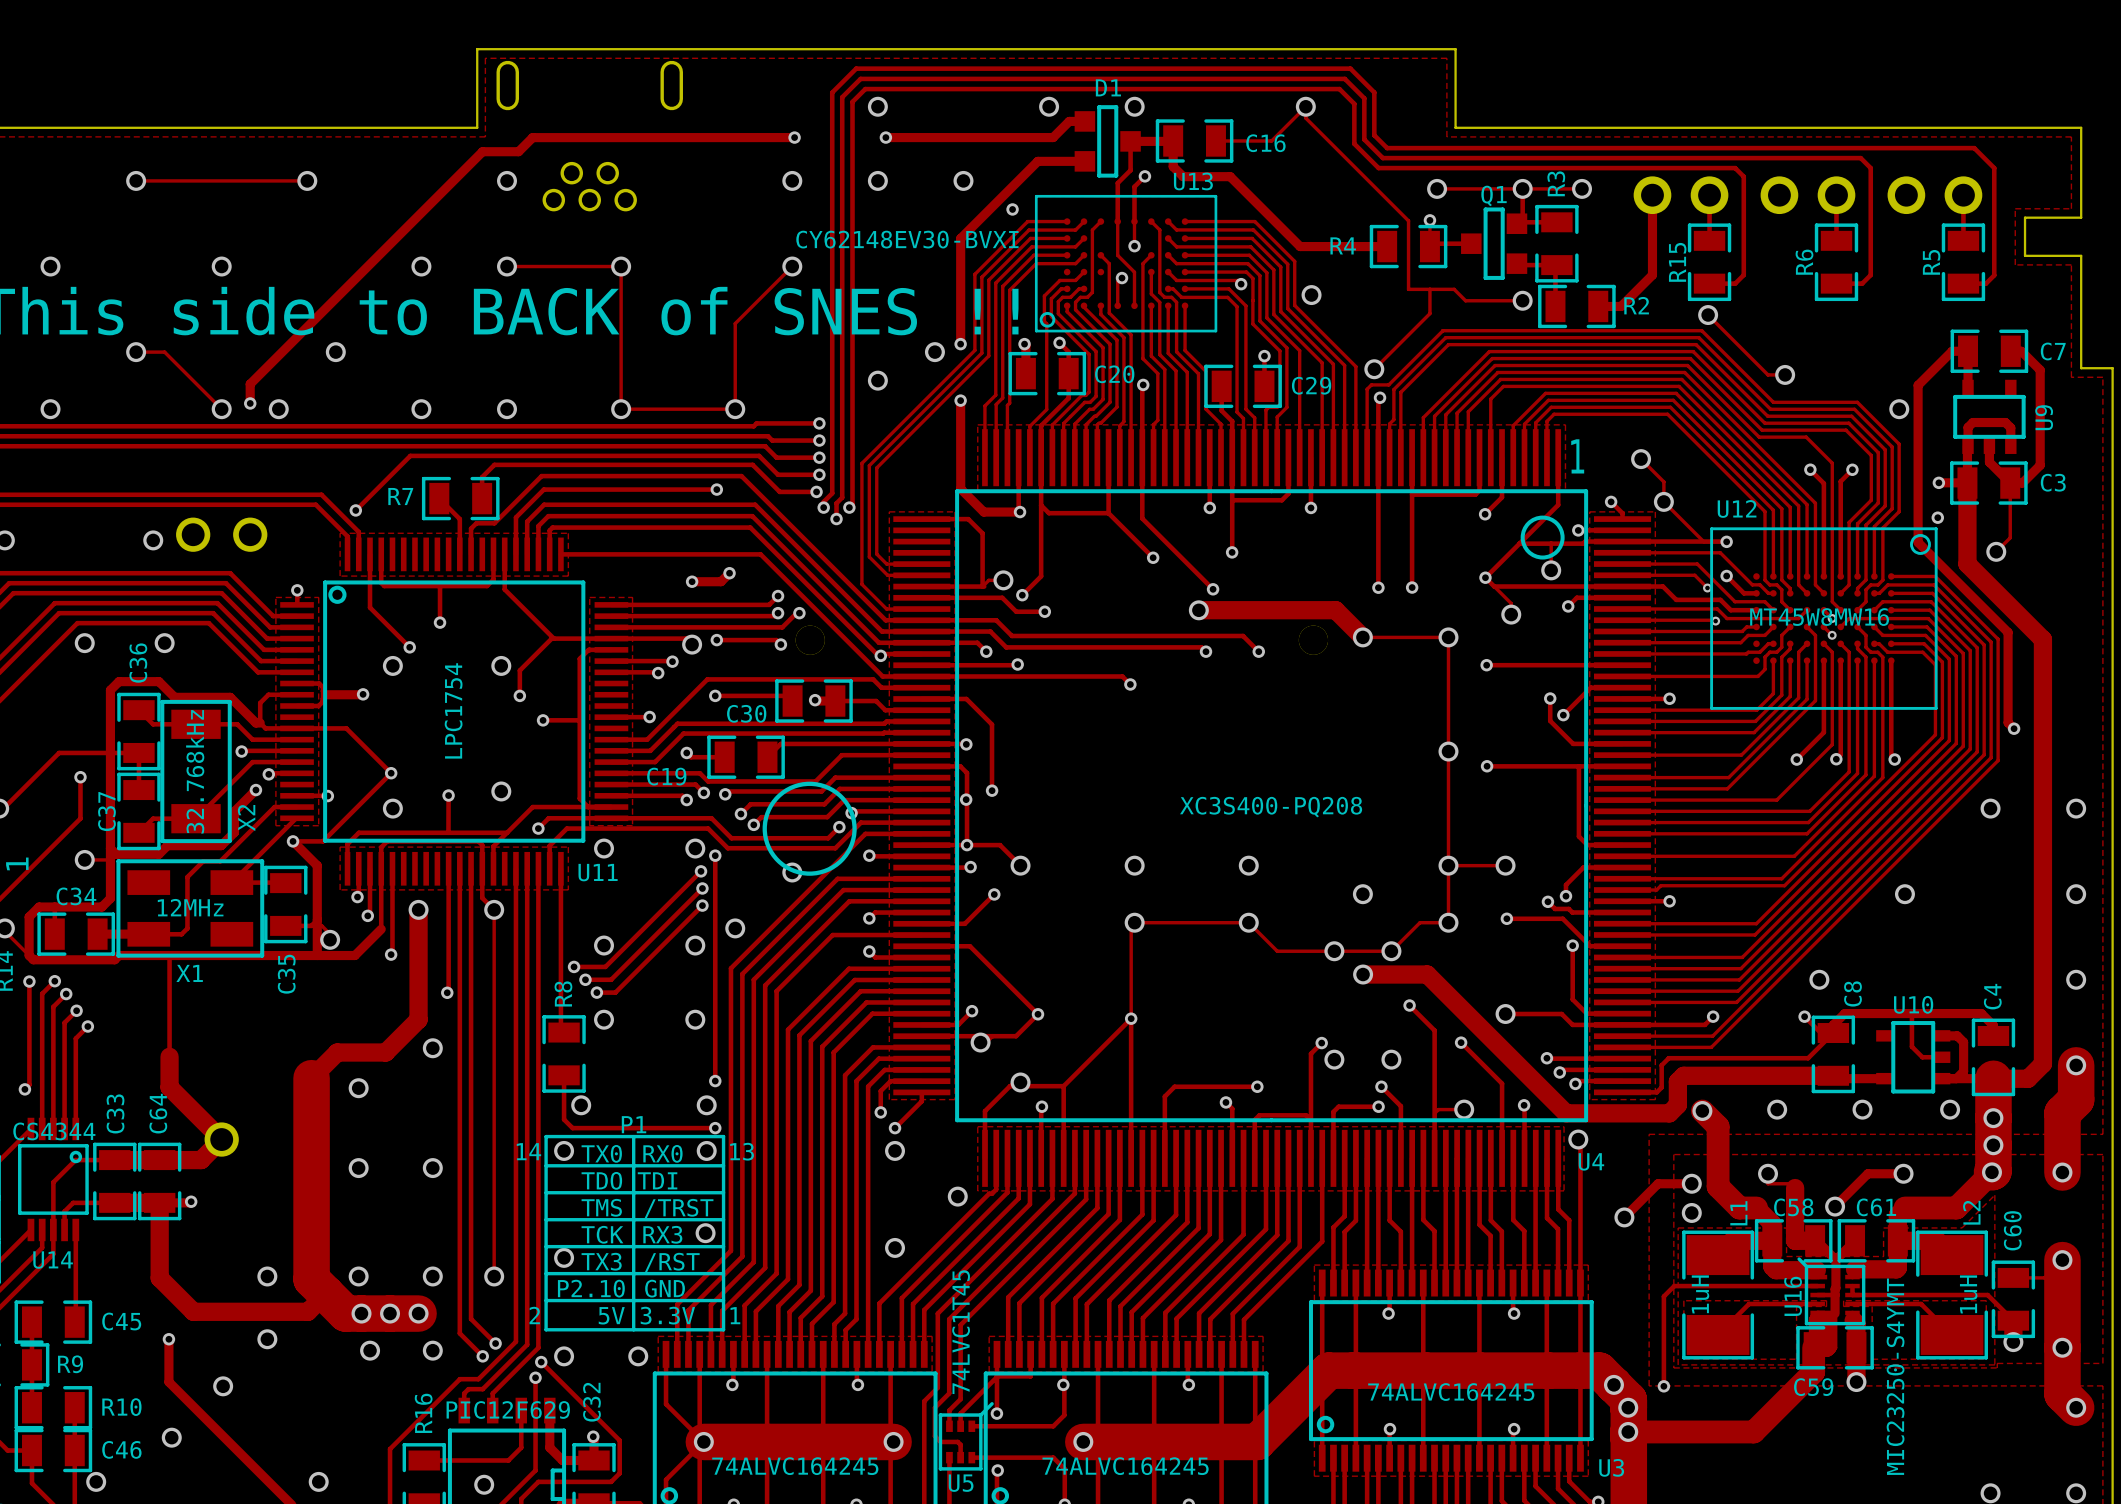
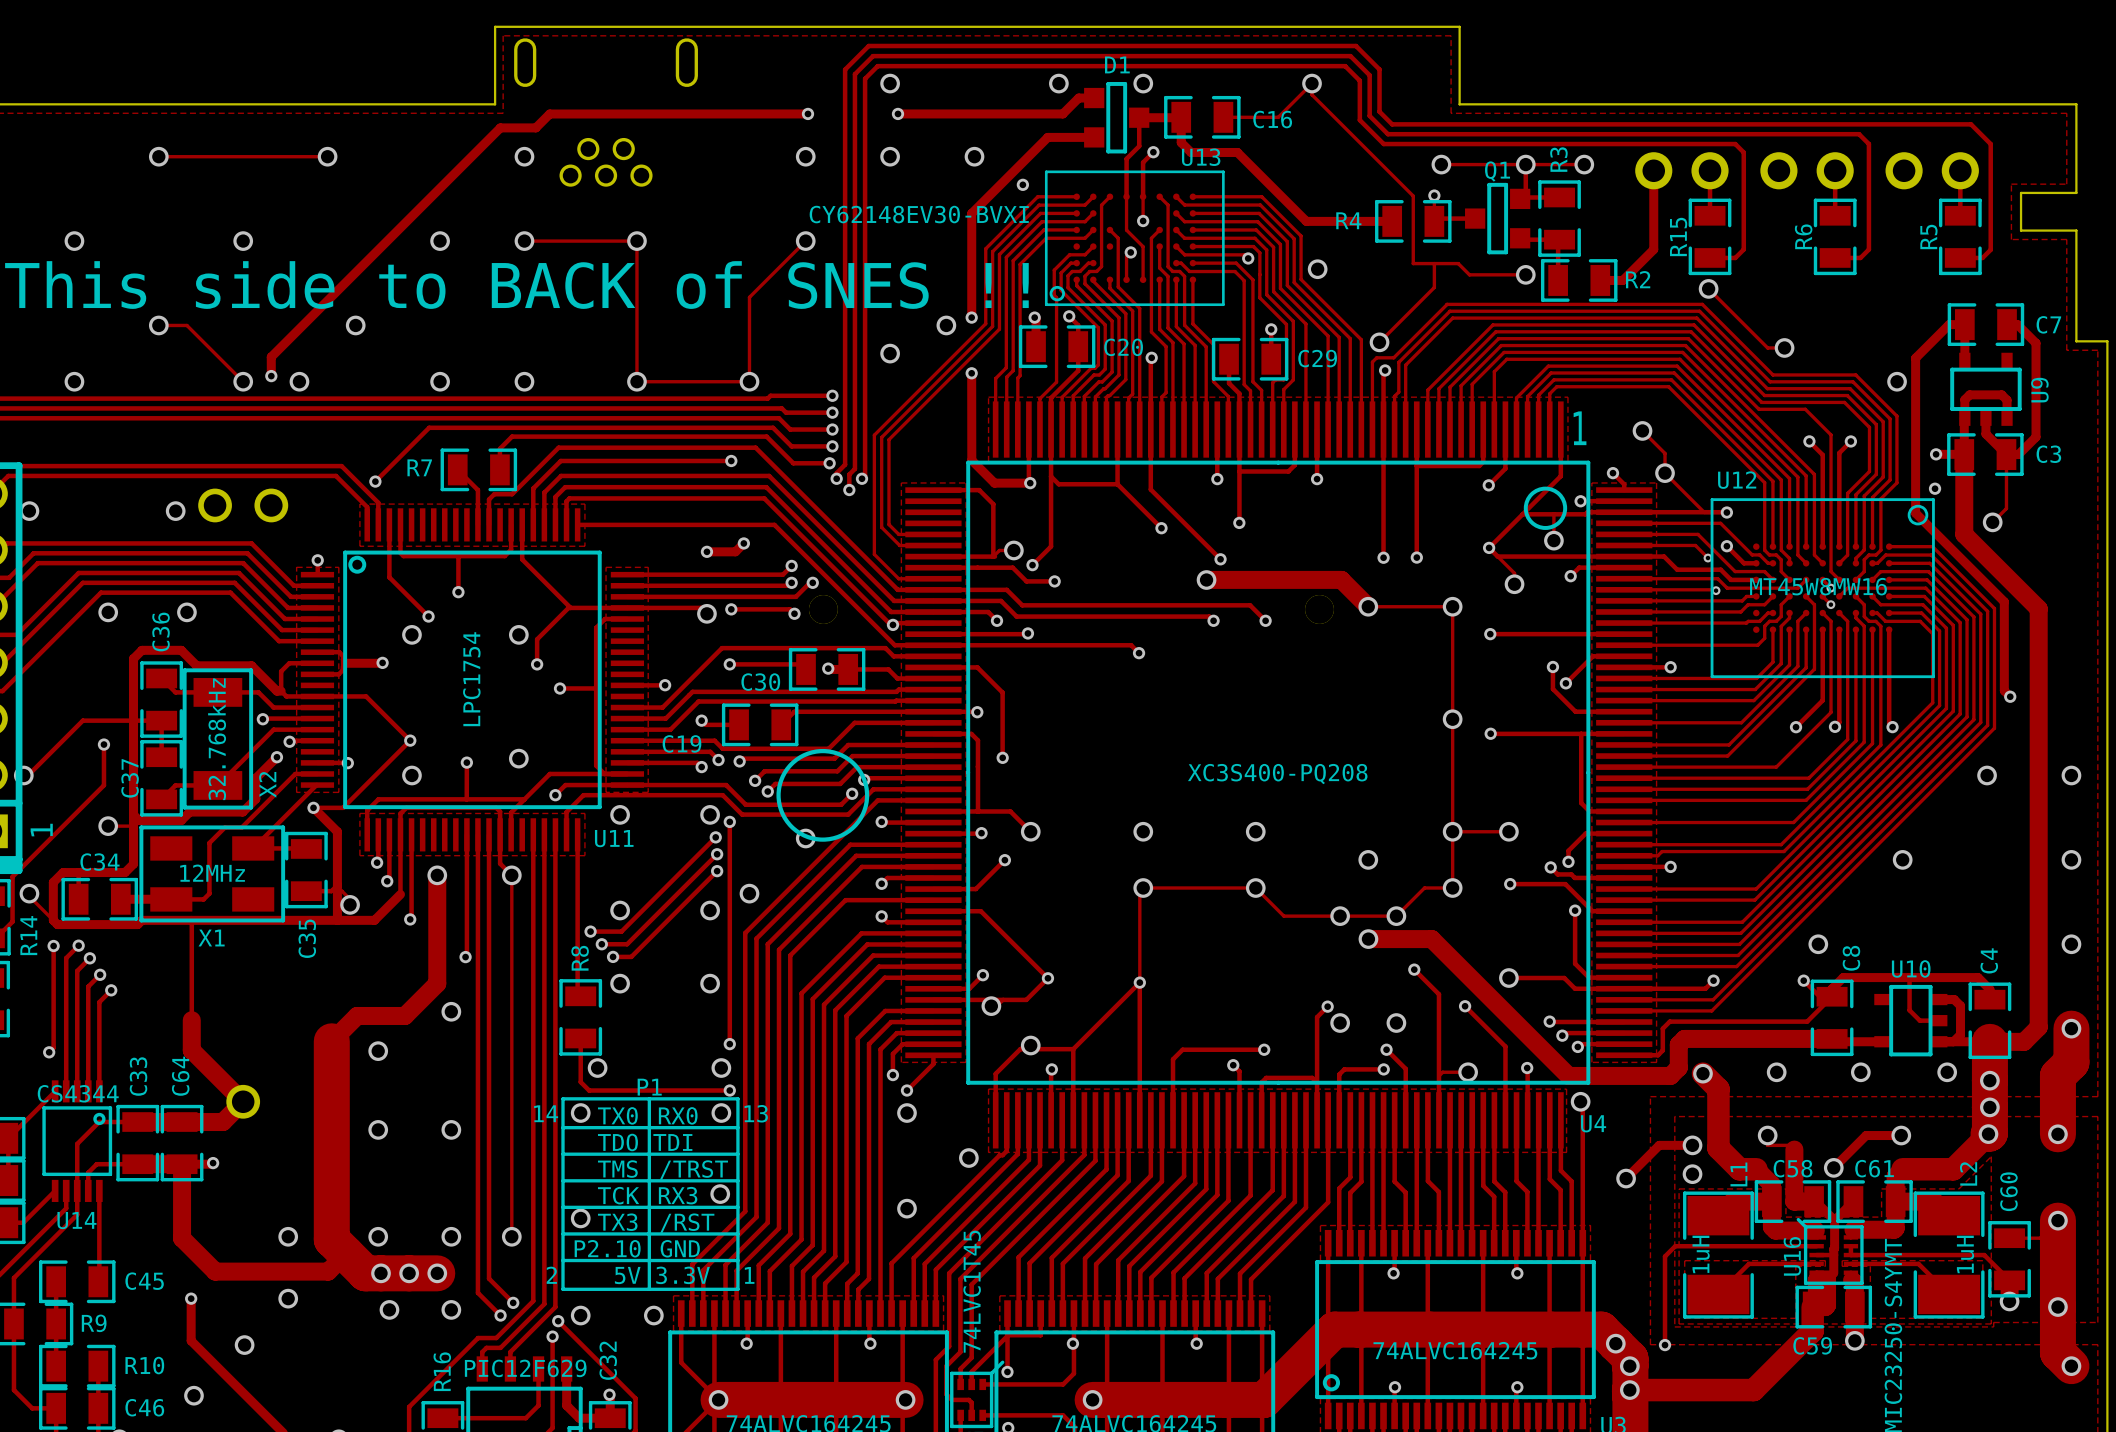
track: (611, 661) (672, 661) -> none
via: (672, 661) -> none
track: (611, 672) (658, 673) -> none
via: (658, 673) -> none
via: (966, 799) -> none
via: (967, 845) -> none

